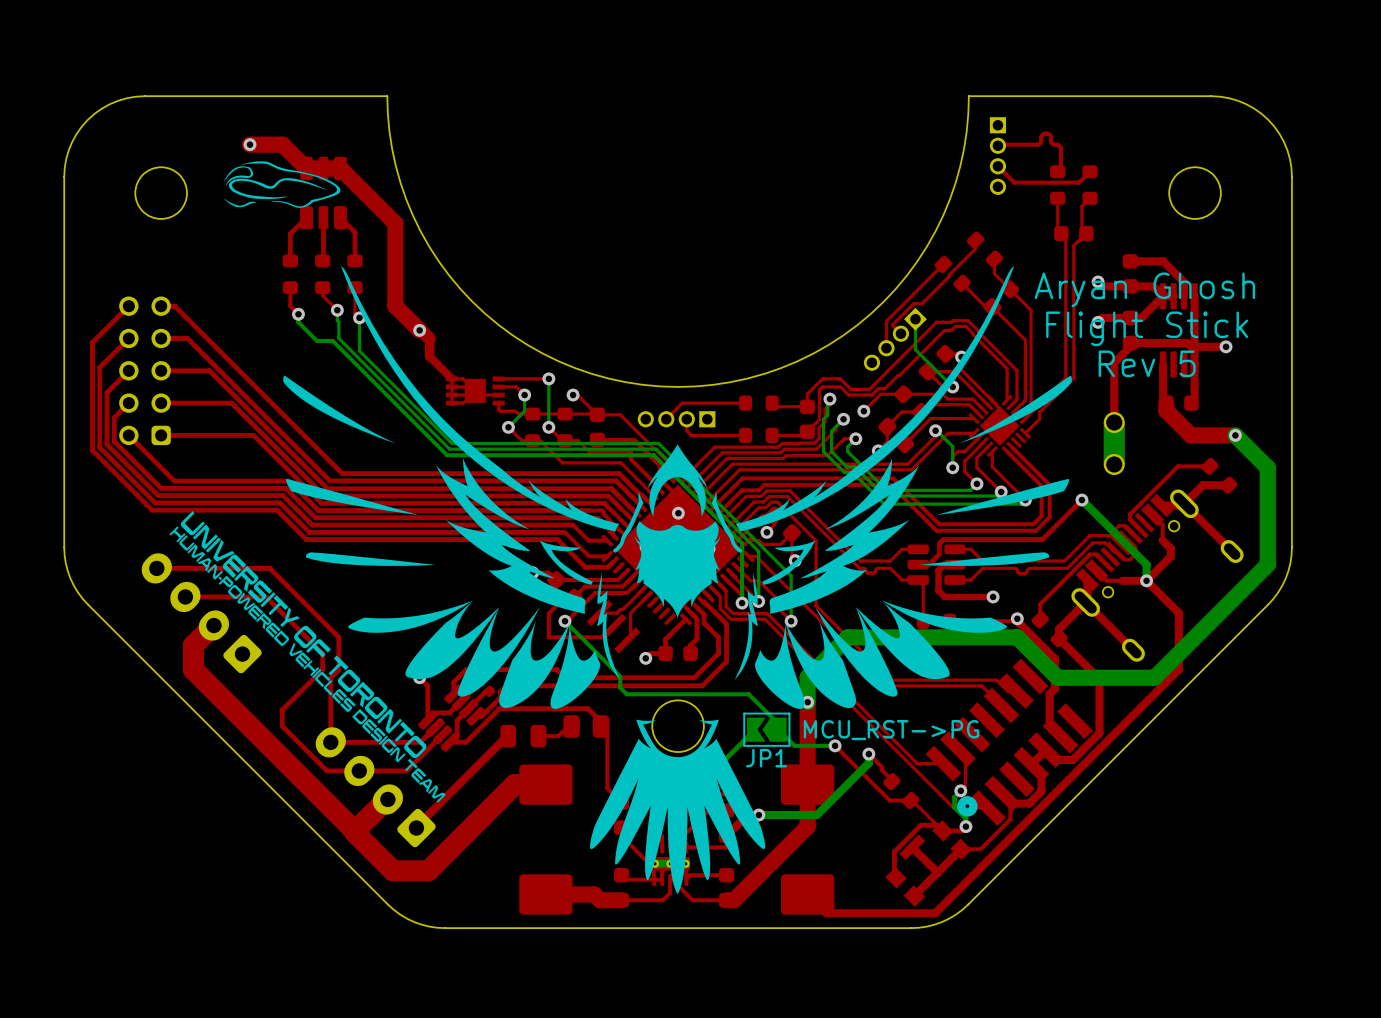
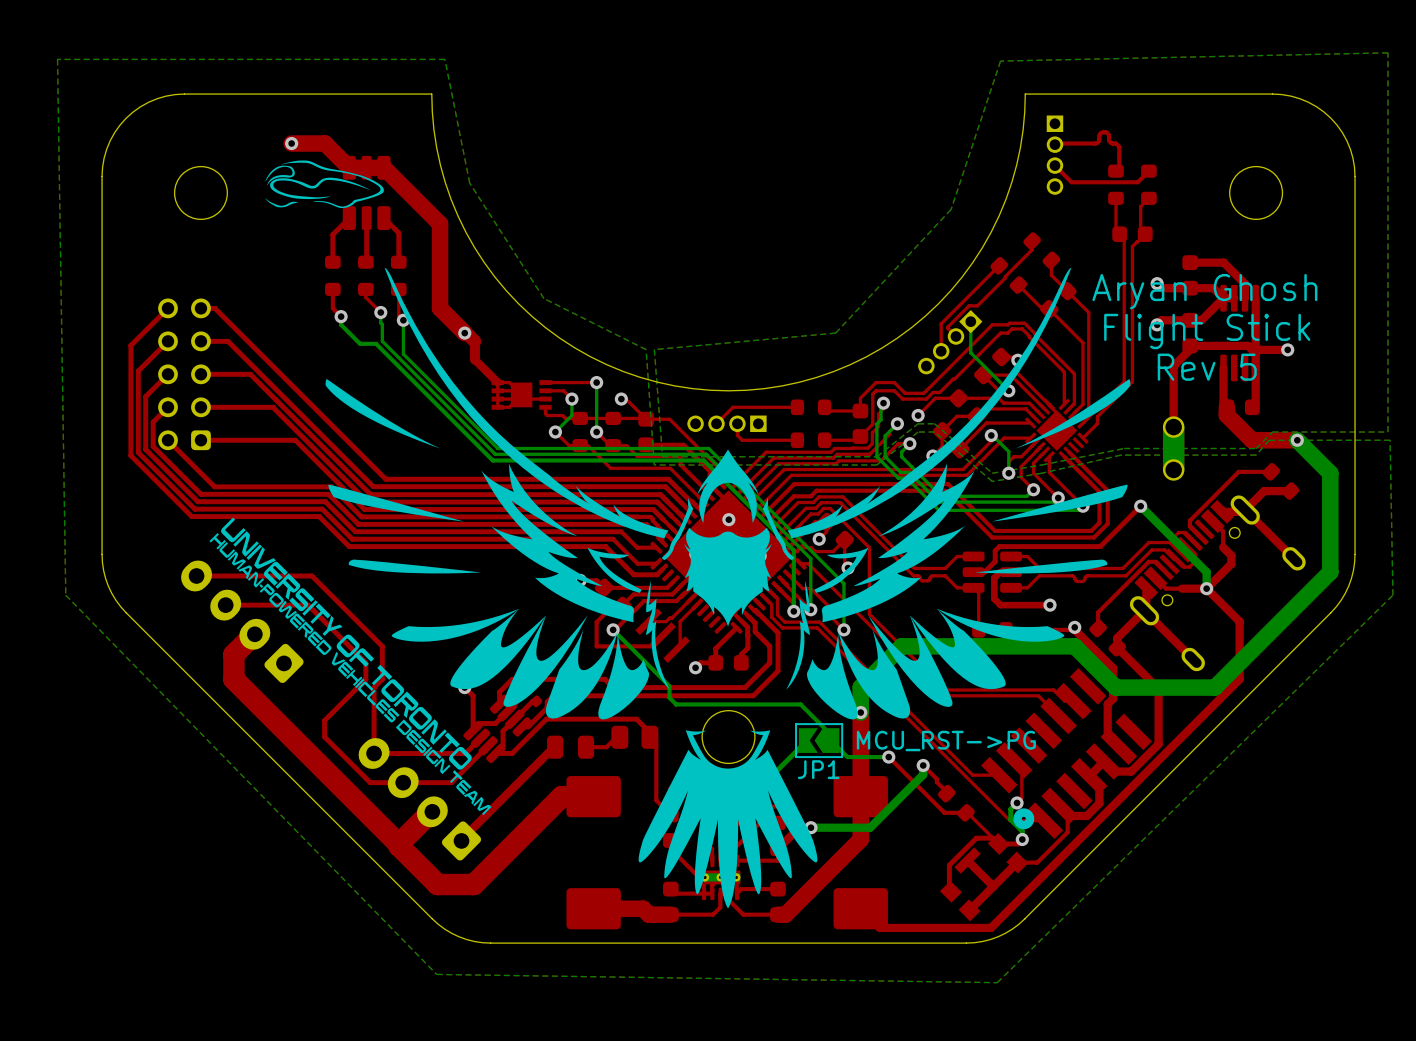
bottom zone outline: none -> (1387, 52) (1387, 432) (1272, 432) (1256, 448) (1124, 448) (992, 473) (934, 423) (918, 423) (876, 456) (662, 456) (654, 349) (835, 333) (951, 209) (1000, 61) (1387, 52)
bottom zone outline: none -> (444, 59) (469, 183) (543, 298) (646, 349) (654, 465) (876, 465) (918, 432) (934, 432) (992, 481) (1041, 473) (1120, 455) (1256, 455) (1269, 440) (1390, 440) (1392, 595) (997, 982) (436, 974) (65, 595) (57, 59) (444, 59)

